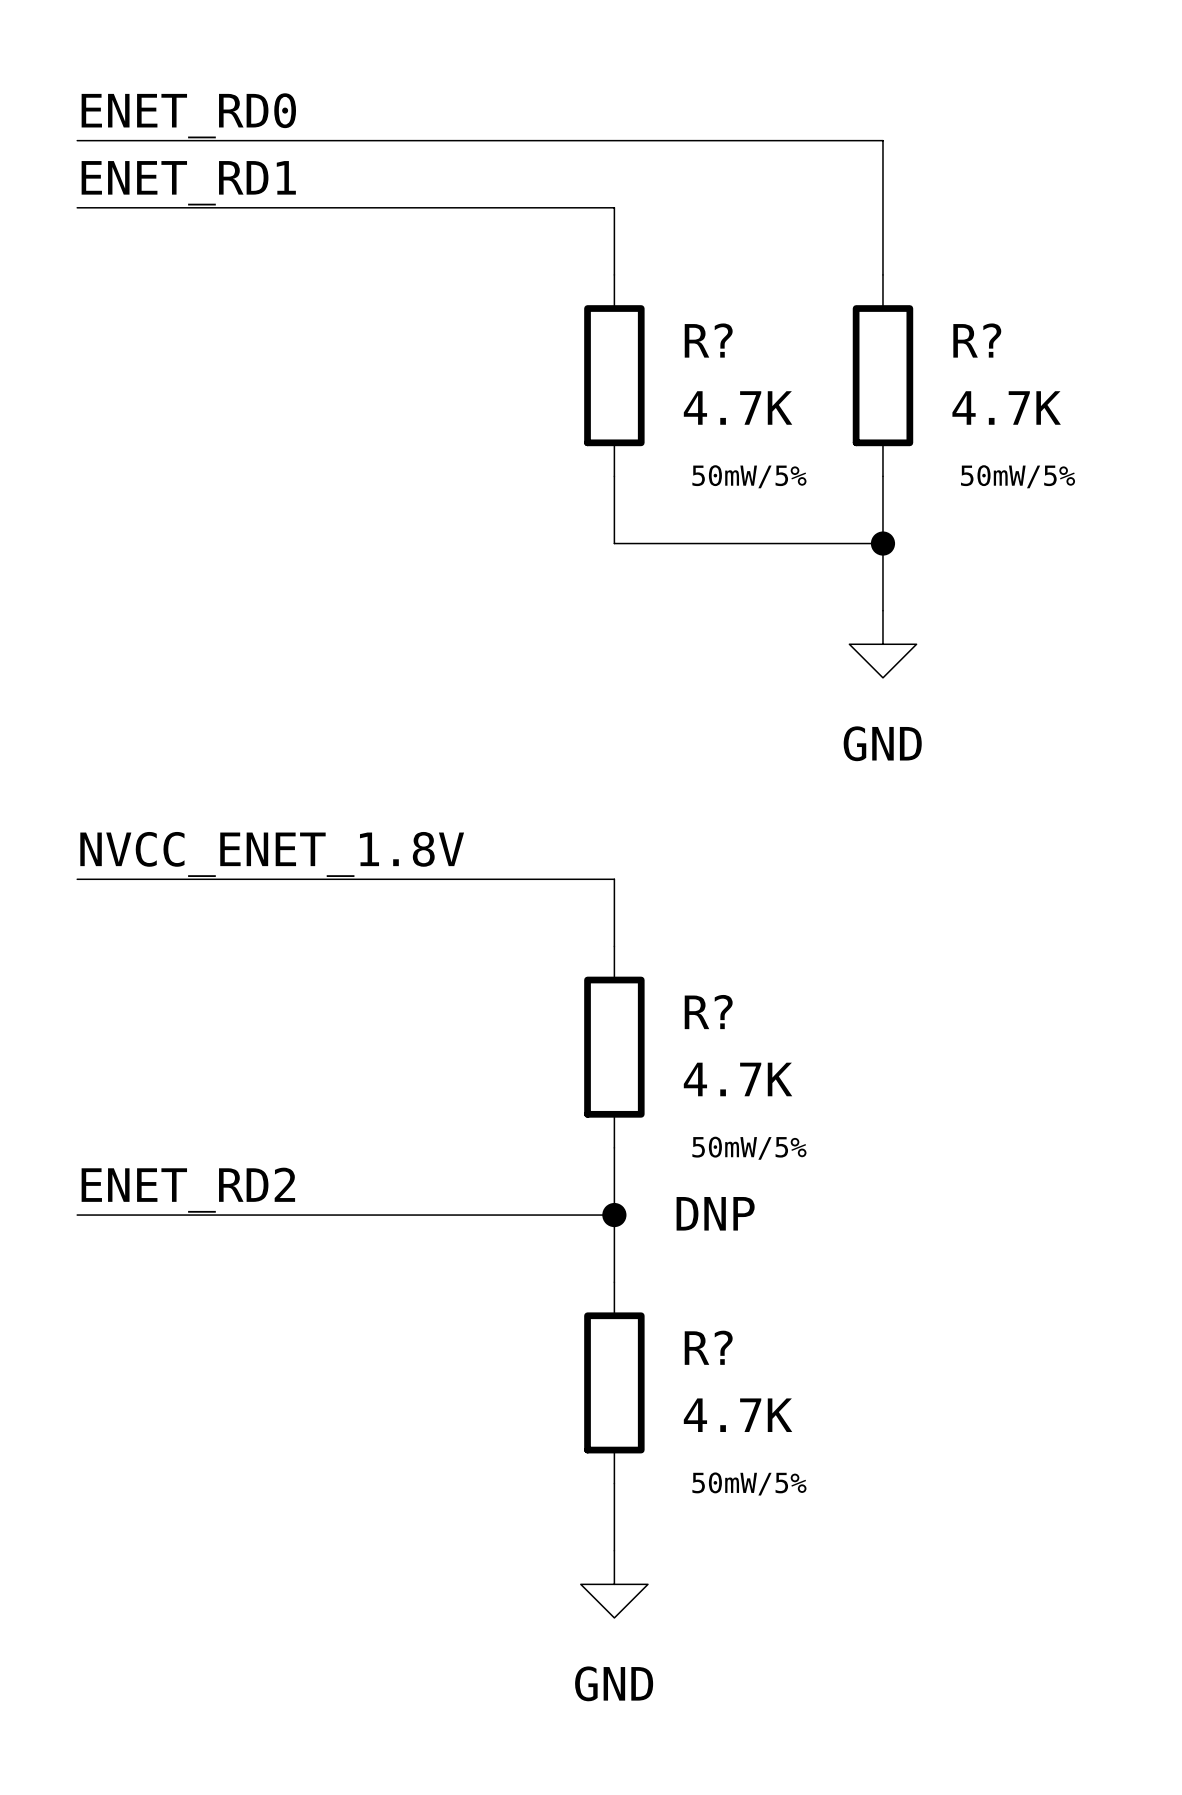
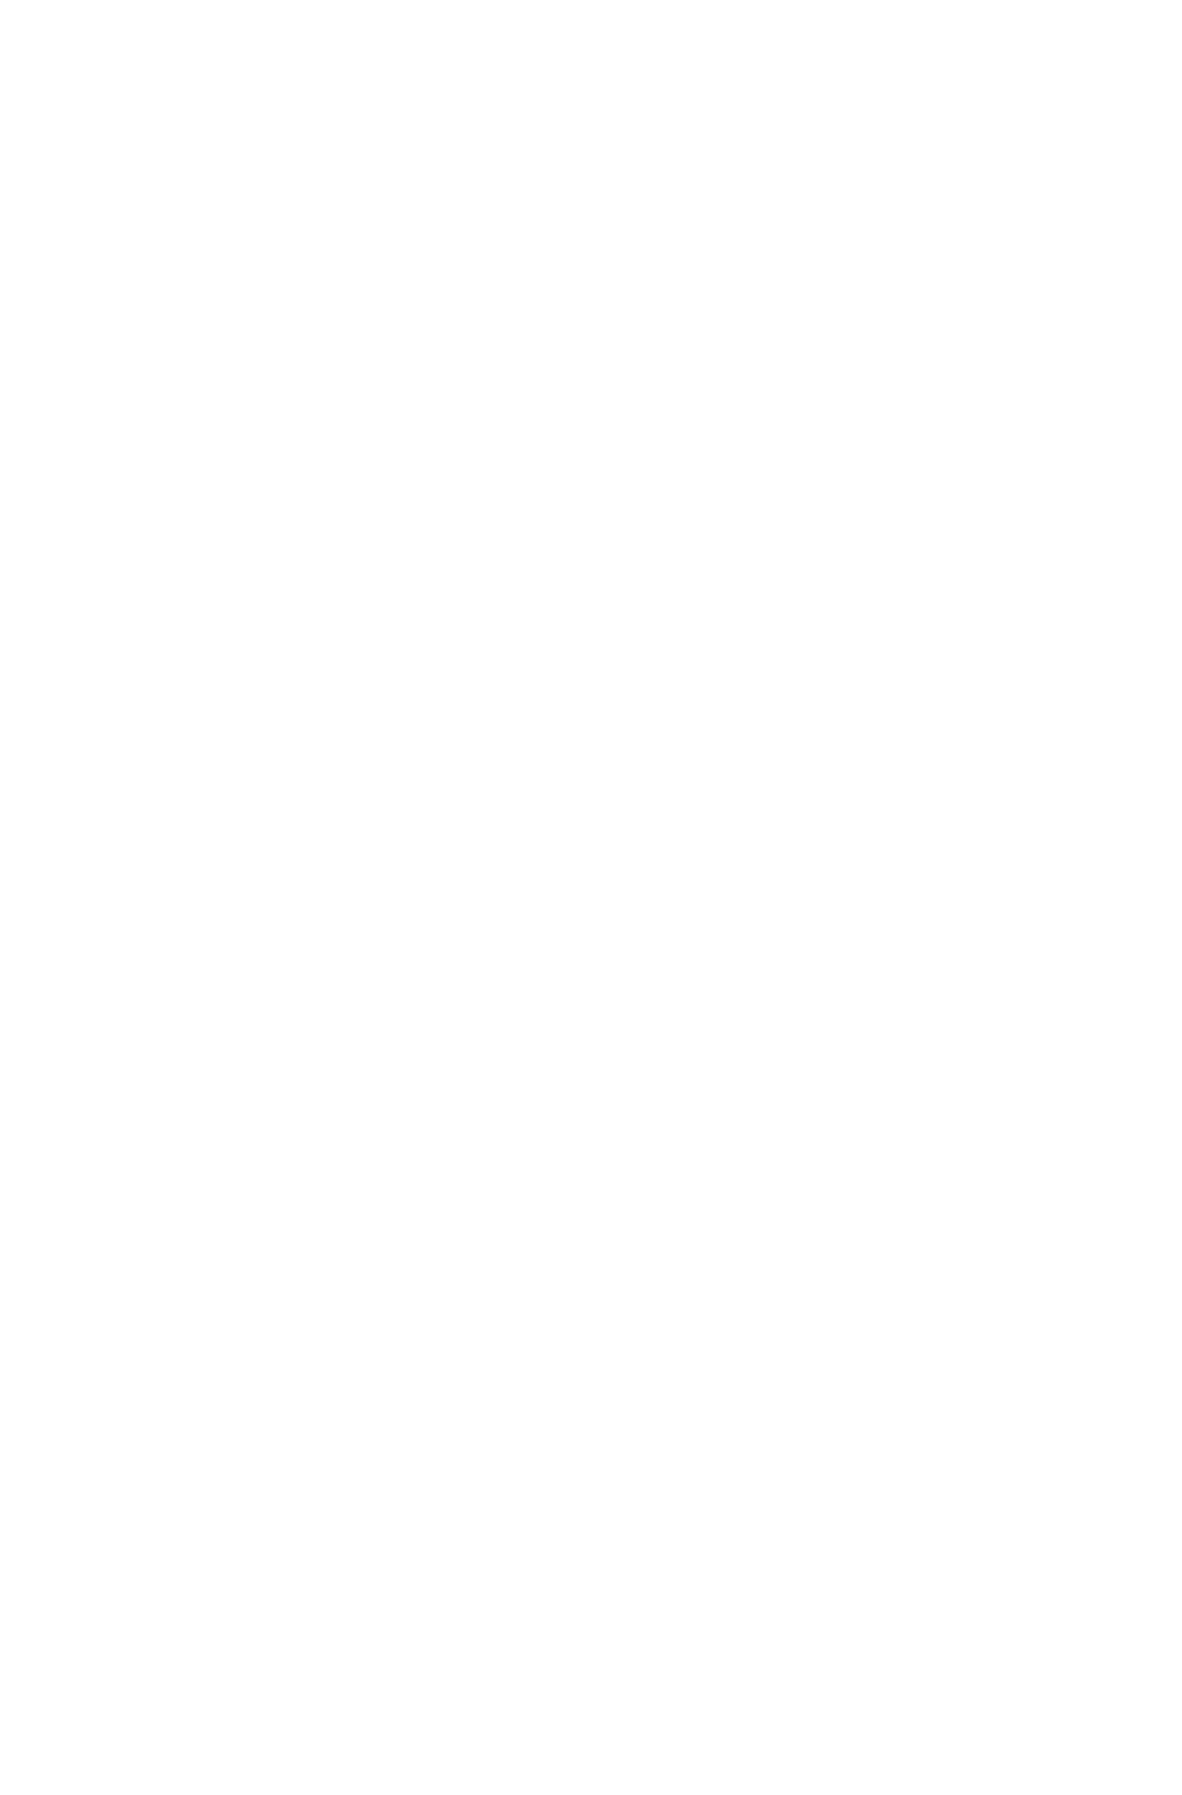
label: ENET_RD0 (188, 115) -> none
wire: (77, 140) (882, 140) (882, 274) -> none
label: ENET_RD1 (188, 183) -> none
wire: (77, 207) (614, 207) (614, 274) -> none
R?: 4.7K (614, 375) -> none
R?: 4.7K (882, 375) -> none
wire: (614, 476) (614, 543) (882, 543) -> none
wire: (882, 476) (882, 610) -> none
junction: (882, 543) -> none
power symbol: GND (882, 644) -> none
label: NVCC_ENET_1.8V (272, 854) -> none
wire: (77, 879) (614, 879) (614, 946) -> none
R?: 4.7K (614, 1047) -> none
wire: (614, 1147) (614, 1282) -> none
label: ENET_RD2 (188, 1190) -> none
wire: (77, 1215) (614, 1215) -> none
junction: (614, 1215) -> none
R?: 4.7K (614, 1382) -> none
wire: (614, 1483) (614, 1550) -> none
power symbol: GND (614, 1584) -> none

